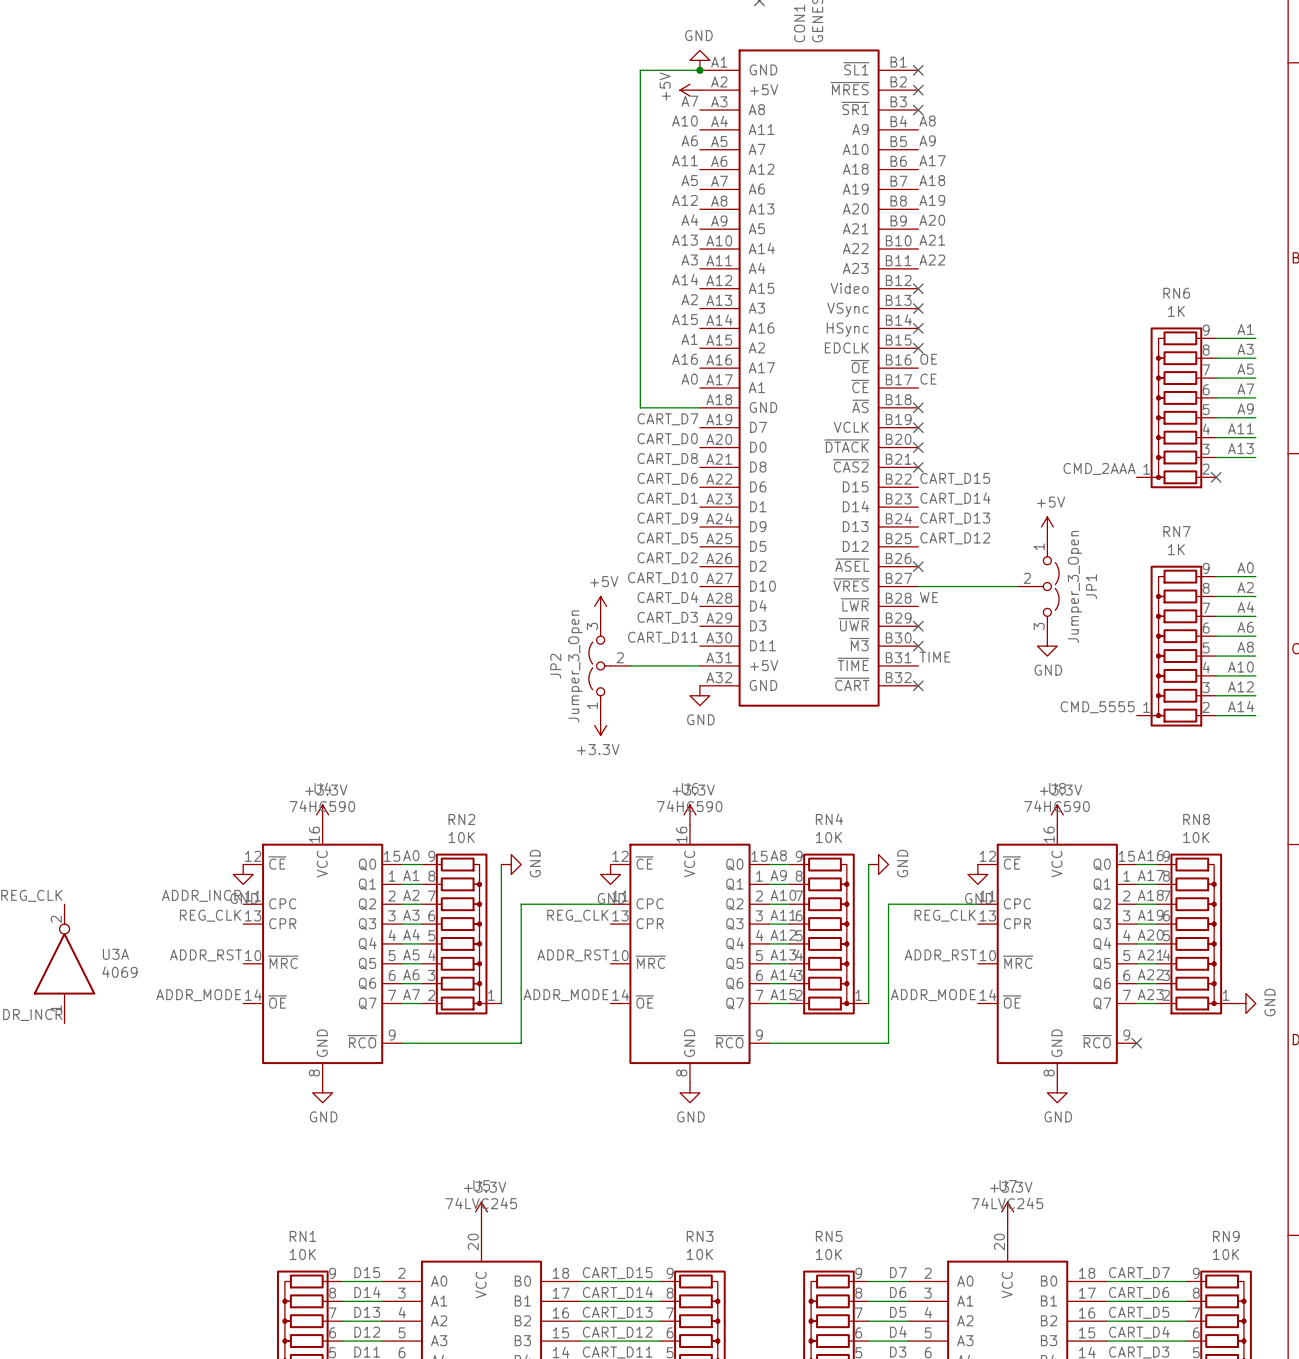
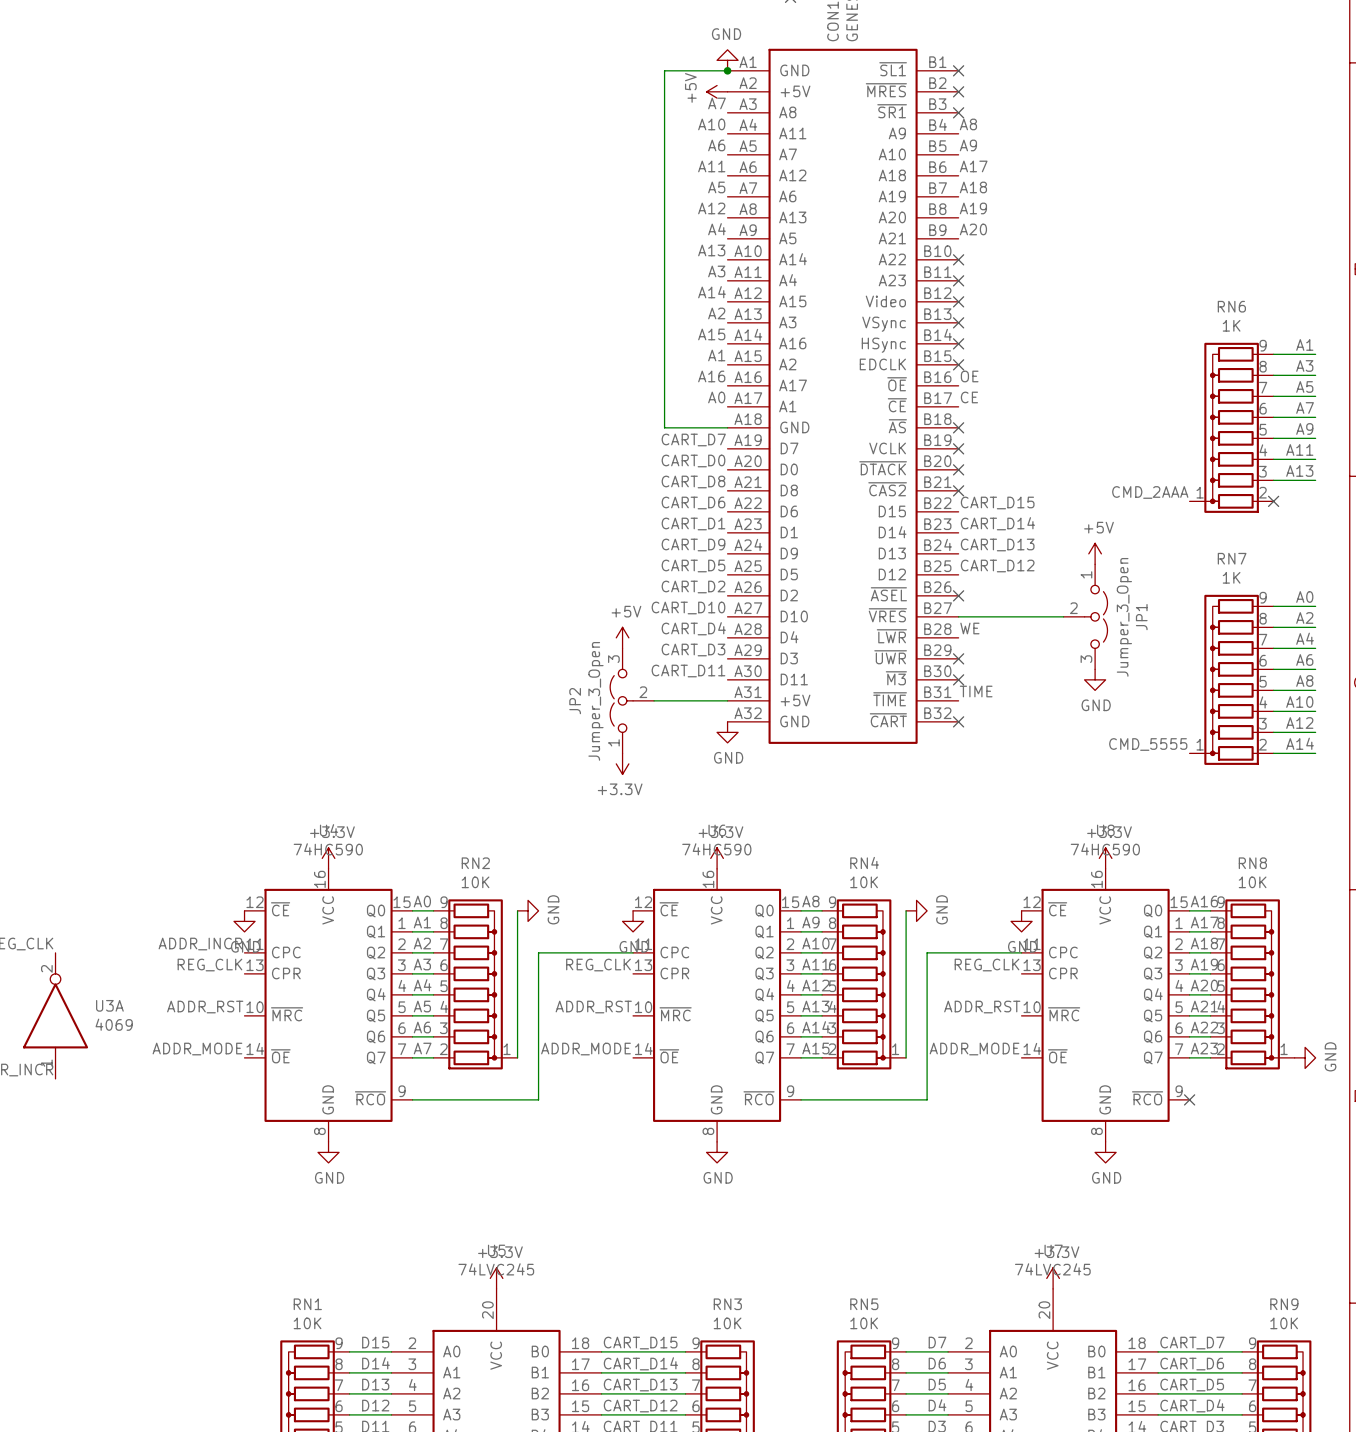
label: A21 (932, 240) -> none
no-connect mark: none -> (958, 259)
label: A22 (932, 260) -> none
no-connect mark: none -> (958, 280)

